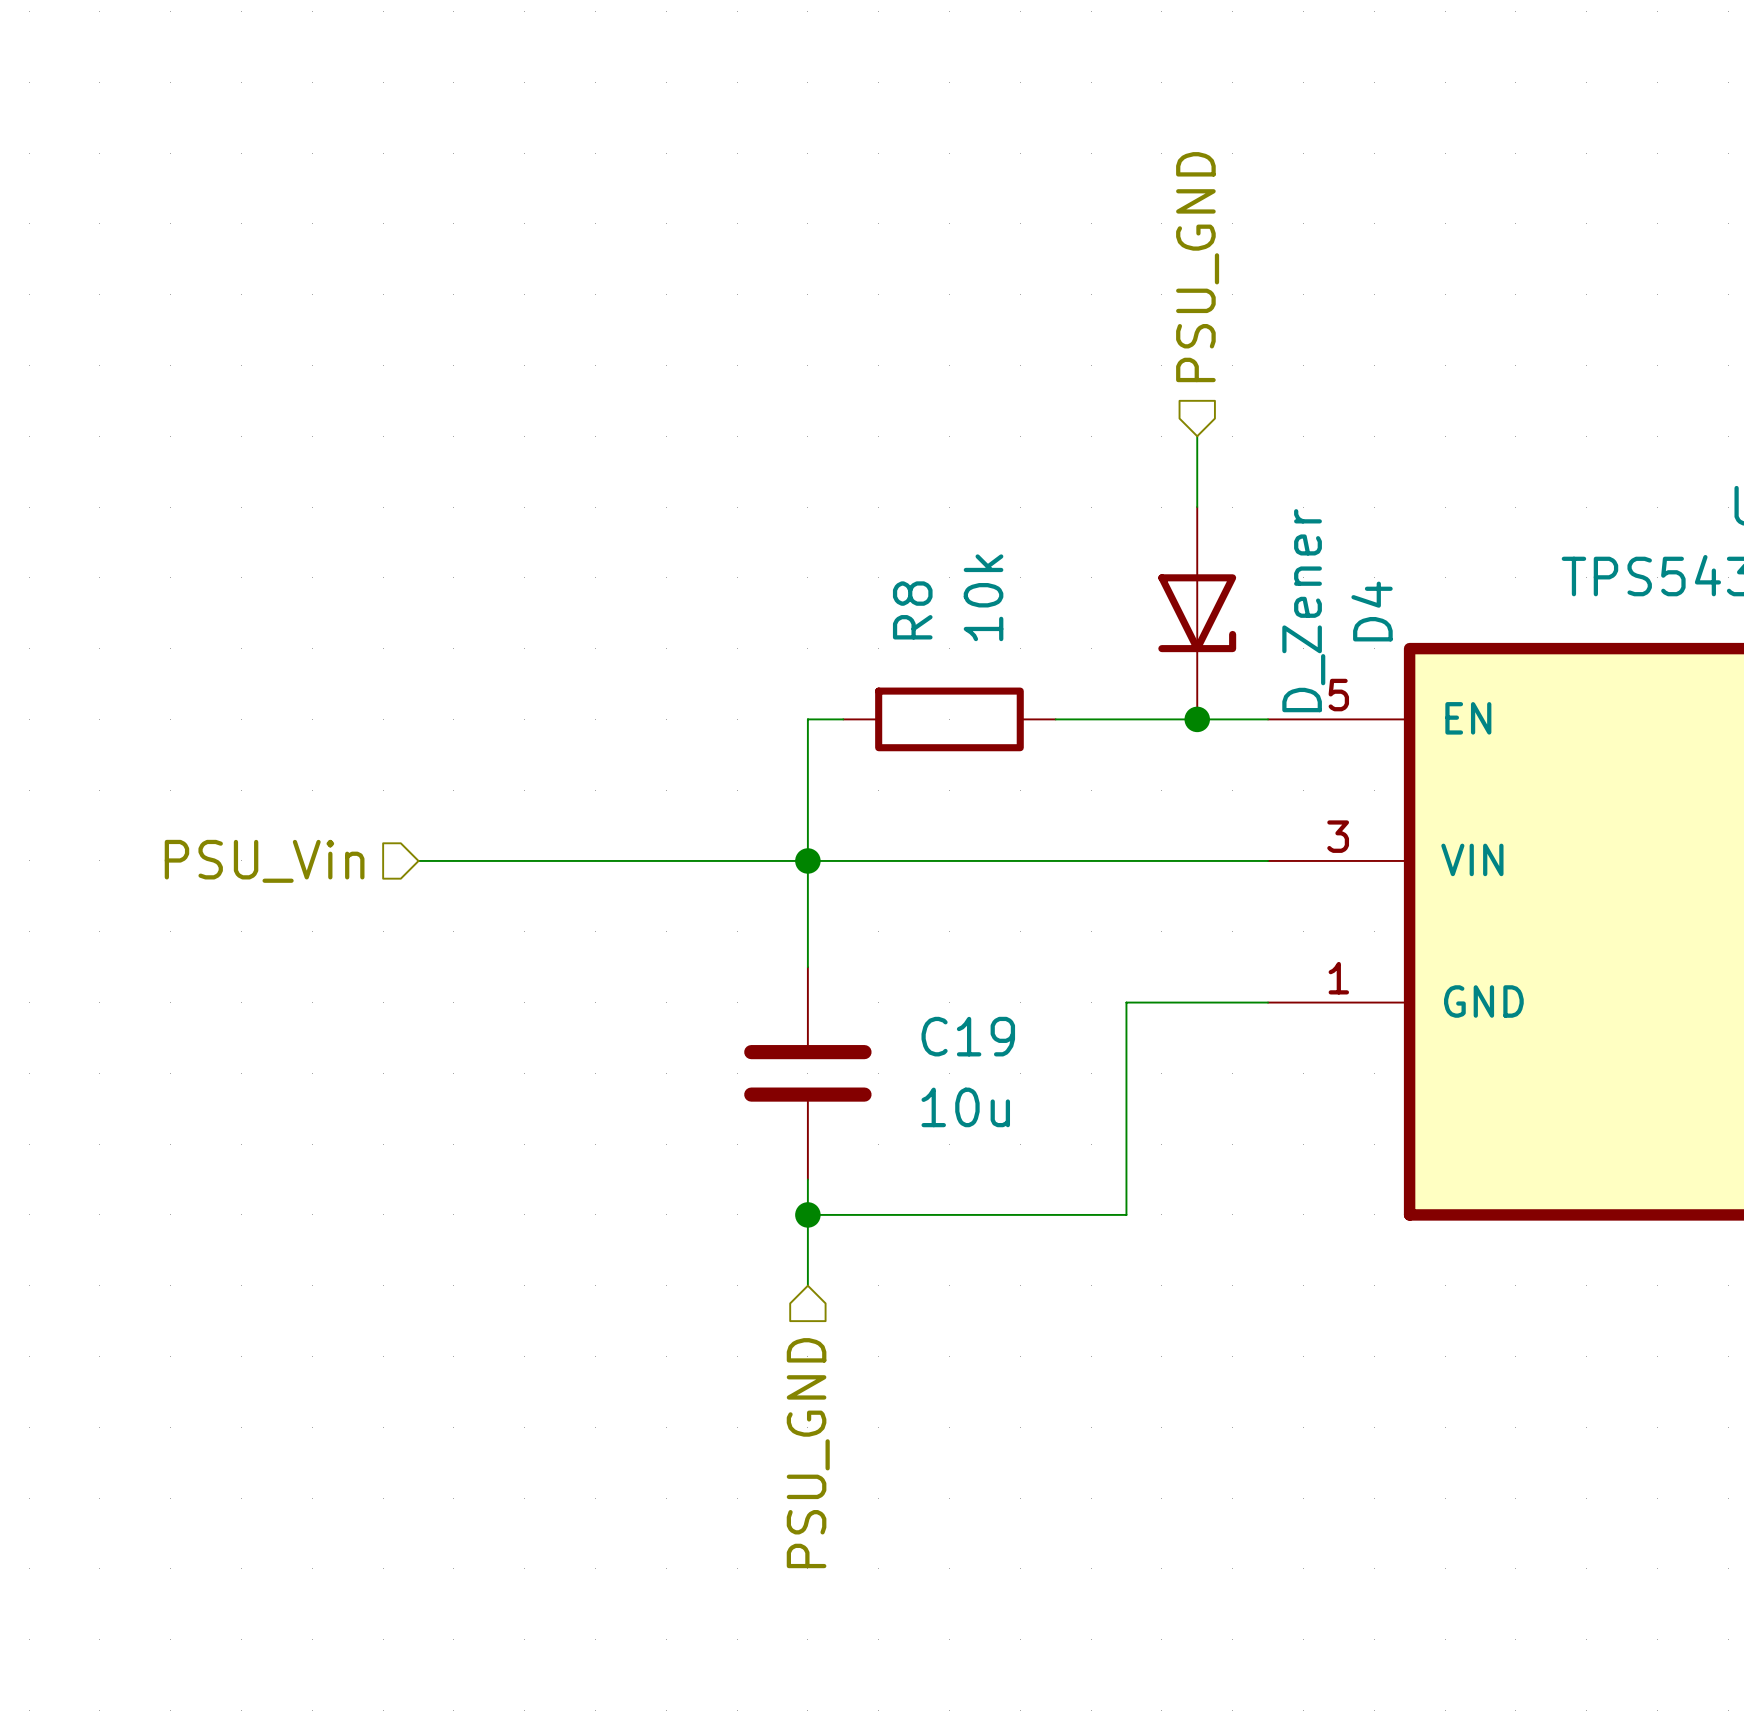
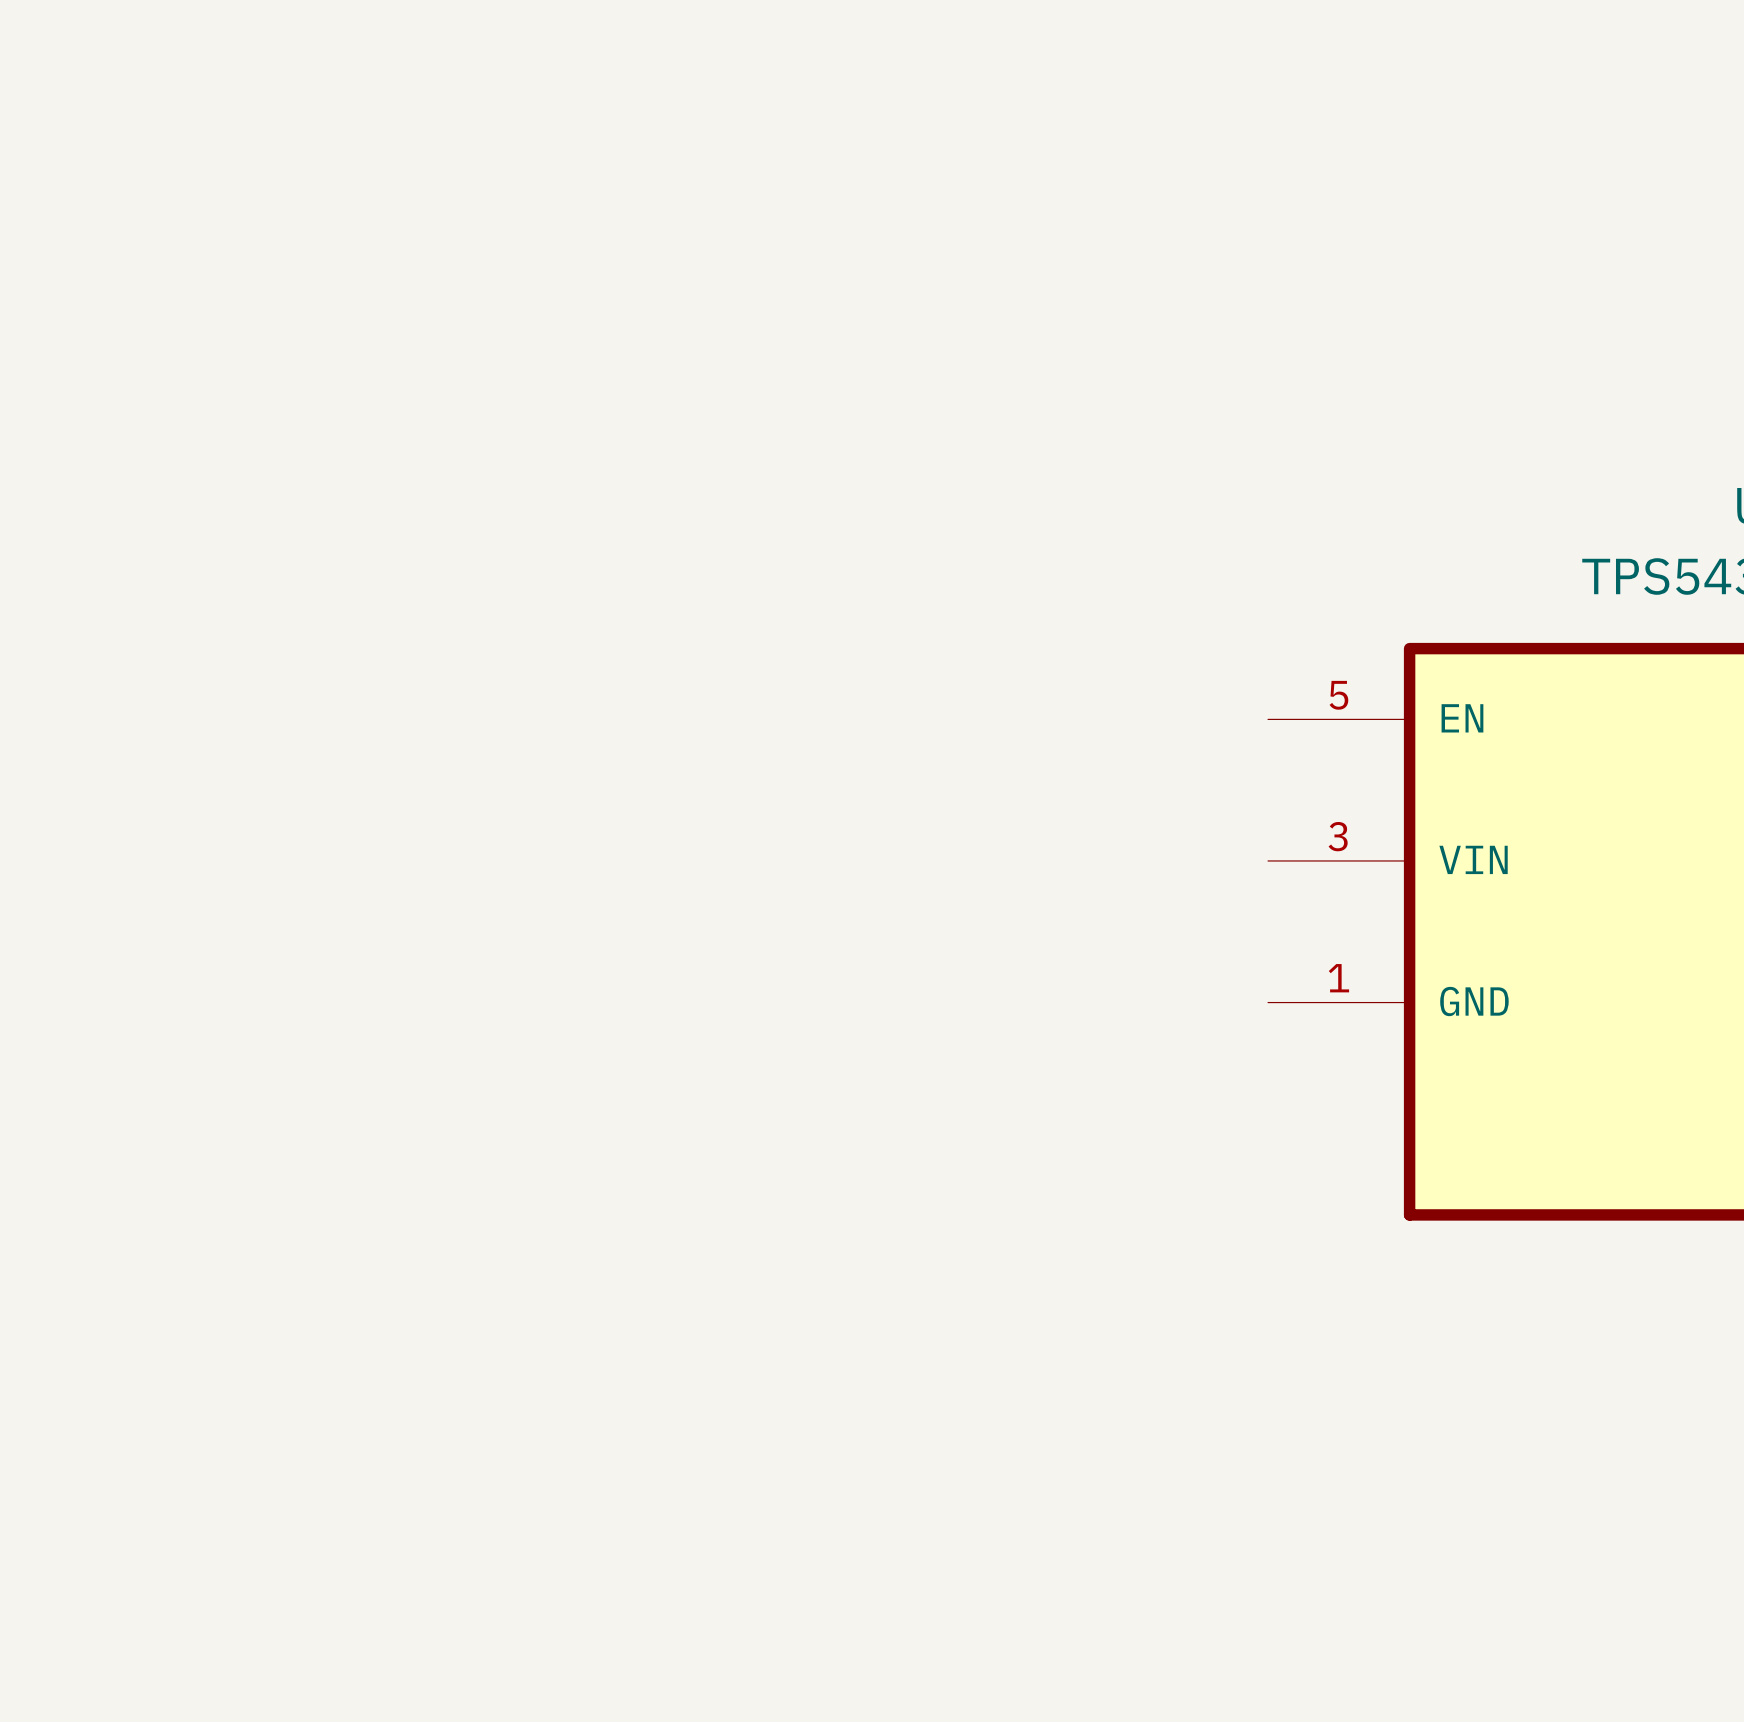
hierarchical label: PSU_GND (1197, 267) -> none
wire: (1197, 436) (1197, 507) -> none
D4: D_Zener (1197, 613) -> none
wire: (843, 719) (807, 719) (807, 967) -> none
R8: 10k (949, 719) -> none
wire: (1055, 719) (1268, 719) -> none
junction: (1197, 719) -> none
wire: (418, 860) (1268, 860) -> none
junction: (807, 860) -> none
hierarchical label: PSU_Vin (264, 861) -> none
wire: (1268, 1002) (1126, 1002) (1126, 1214) (807, 1214) -> none
C19: 10u (807, 1073) -> none
wire: (807, 1179) (807, 1285) -> none
junction: (807, 1214) -> none
hierarchical label: PSU_GND (808, 1453) -> none

